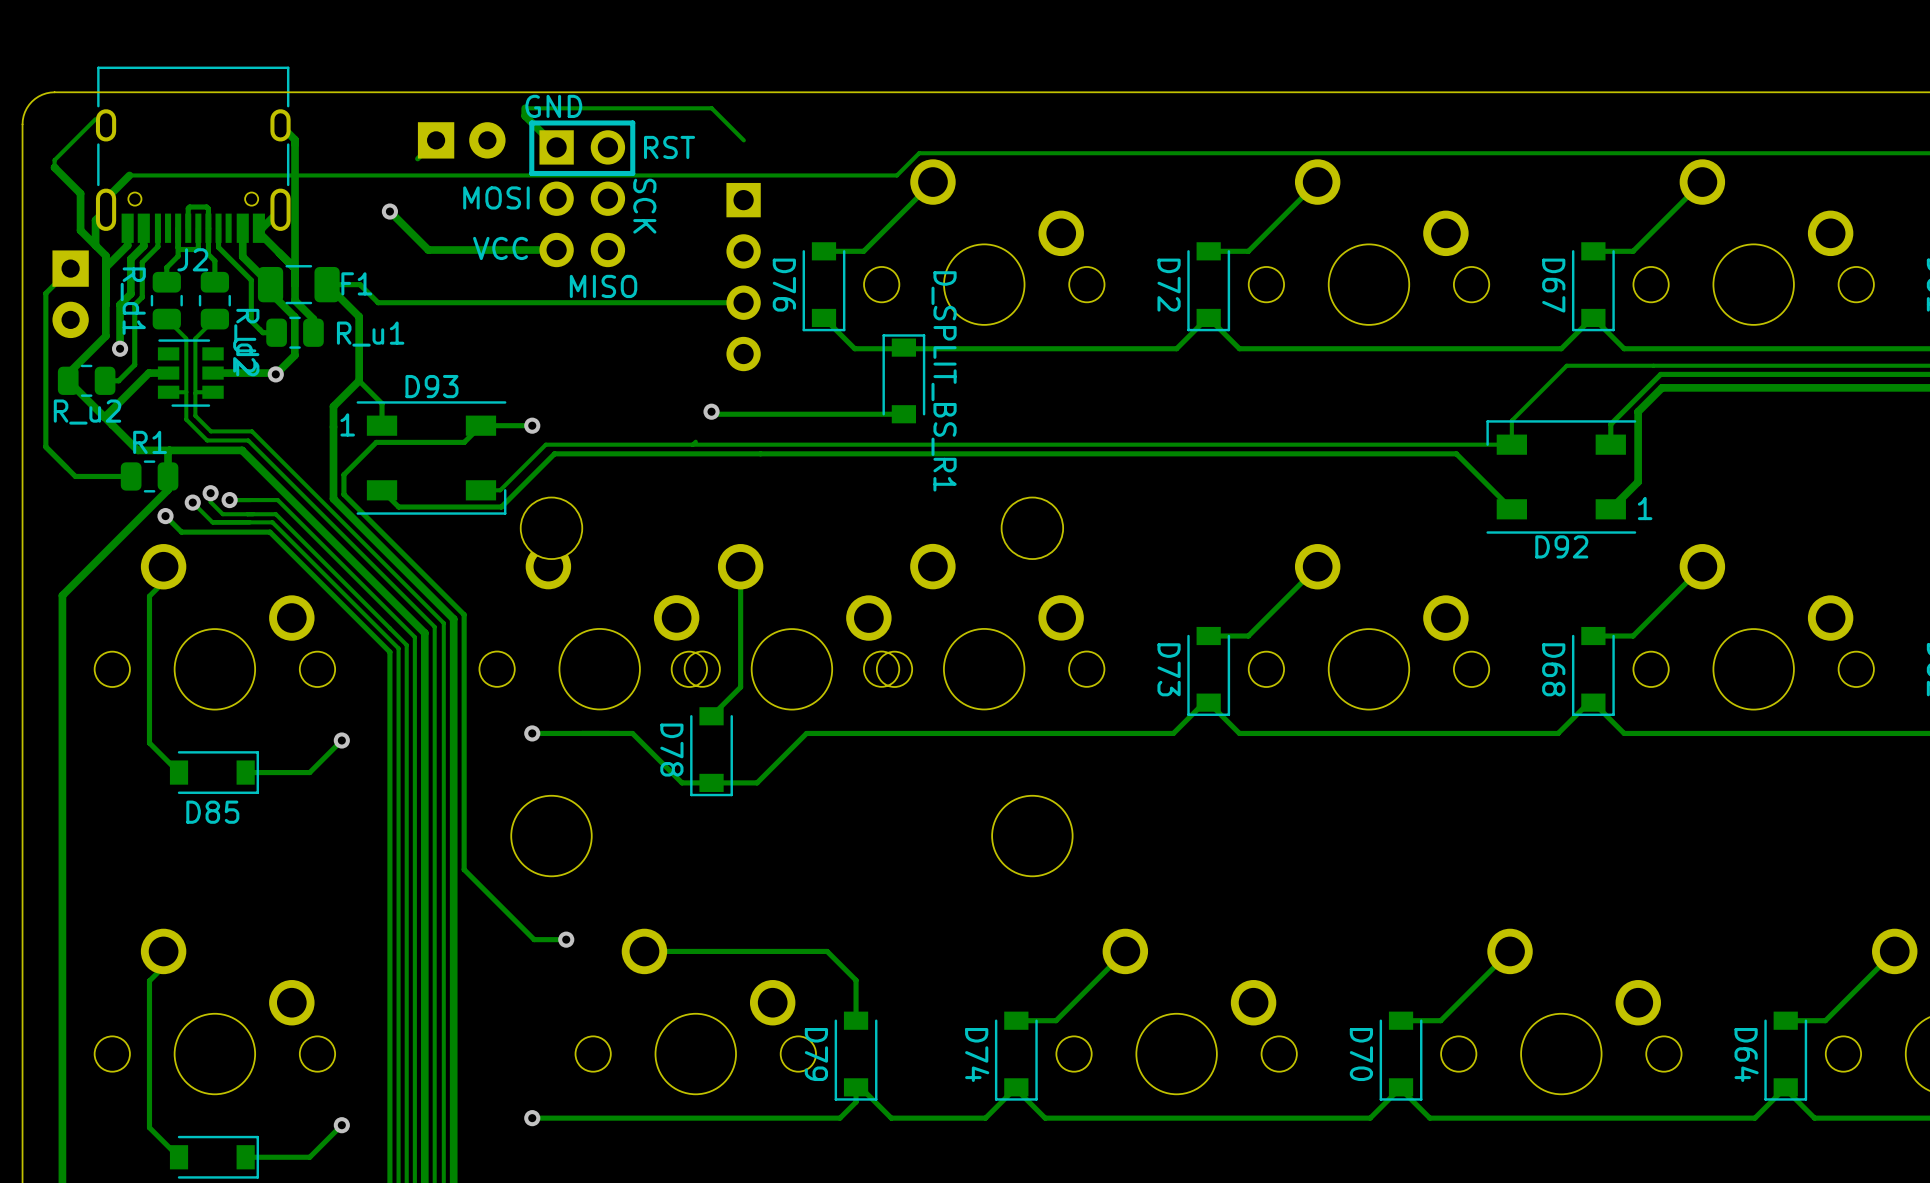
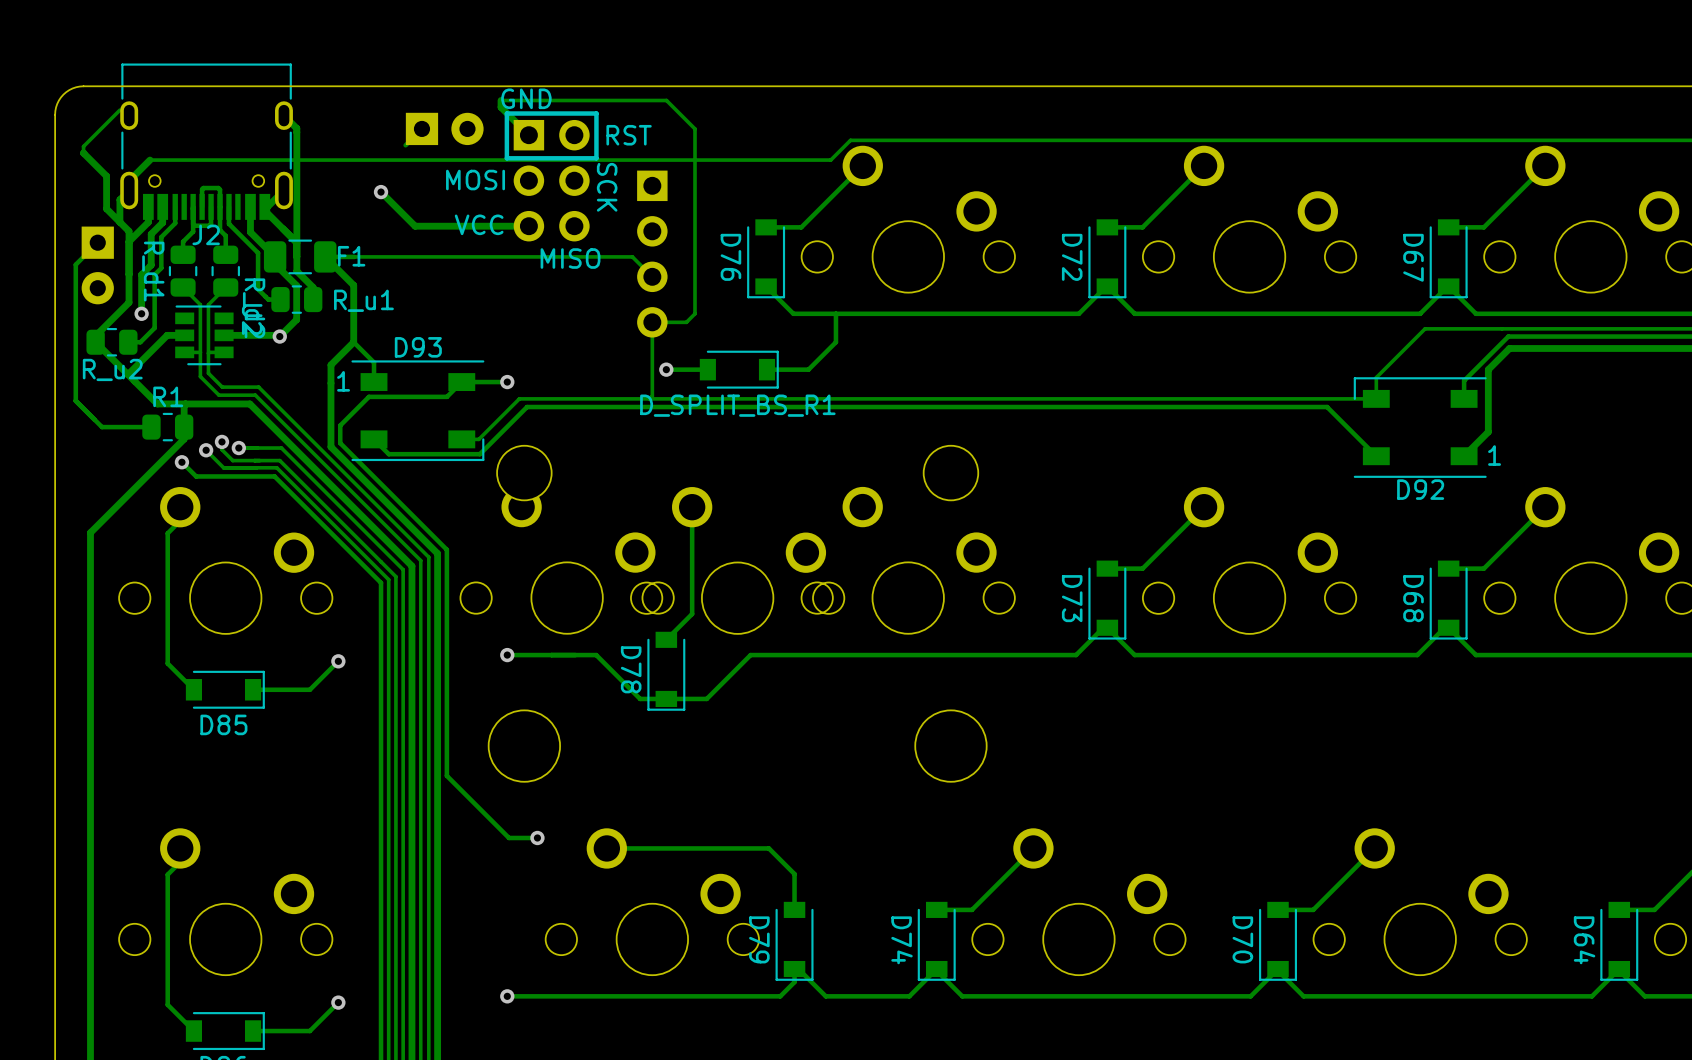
track: none -> (695, 128) (695, 313) (686, 322) (652, 322) (652, 396)
part position: (743, 277) -> (652, 254)
track: (360, 284) (378, 302) (743, 302) -> (354, 256) (632, 256) (652, 276)
track: none -> (835, 313) (835, 342) (808, 369) (767, 369)
D_SPLIT_BS_R1 rotation: 0° (903, 378) -> 90° clockwise (739, 369)
D_SPLIT_BS_R1 position: (903, 378) -> (739, 369)
track: (711, 411) (714, 414) (903, 414) -> (666, 369) (707, 369)

